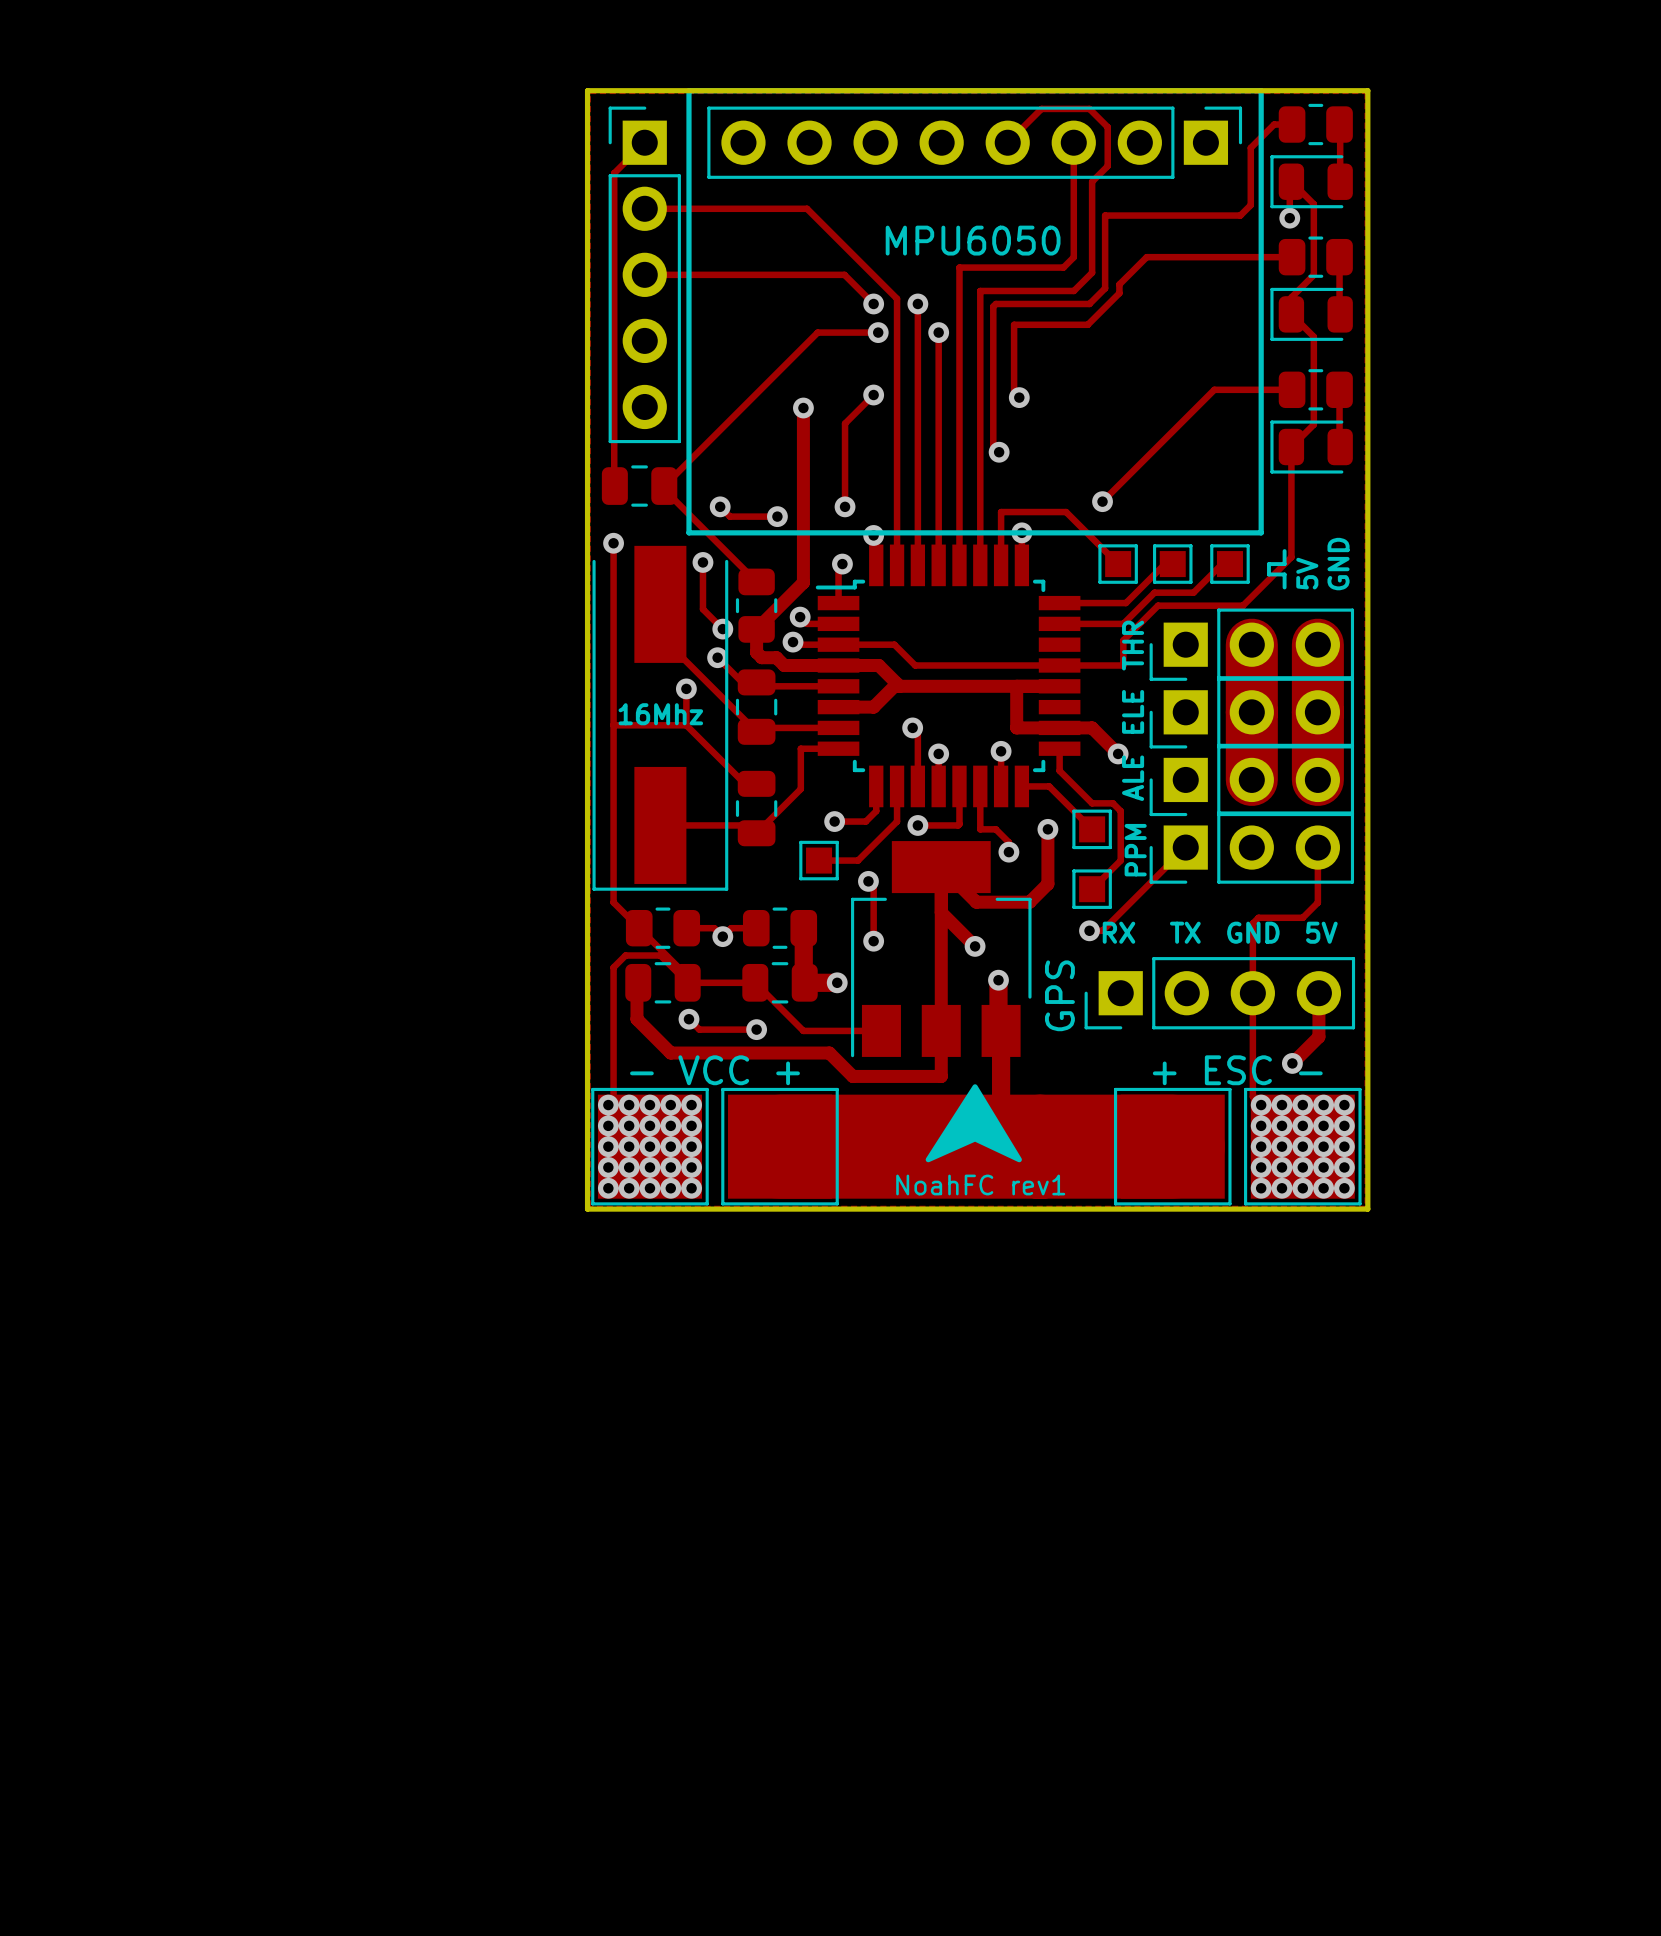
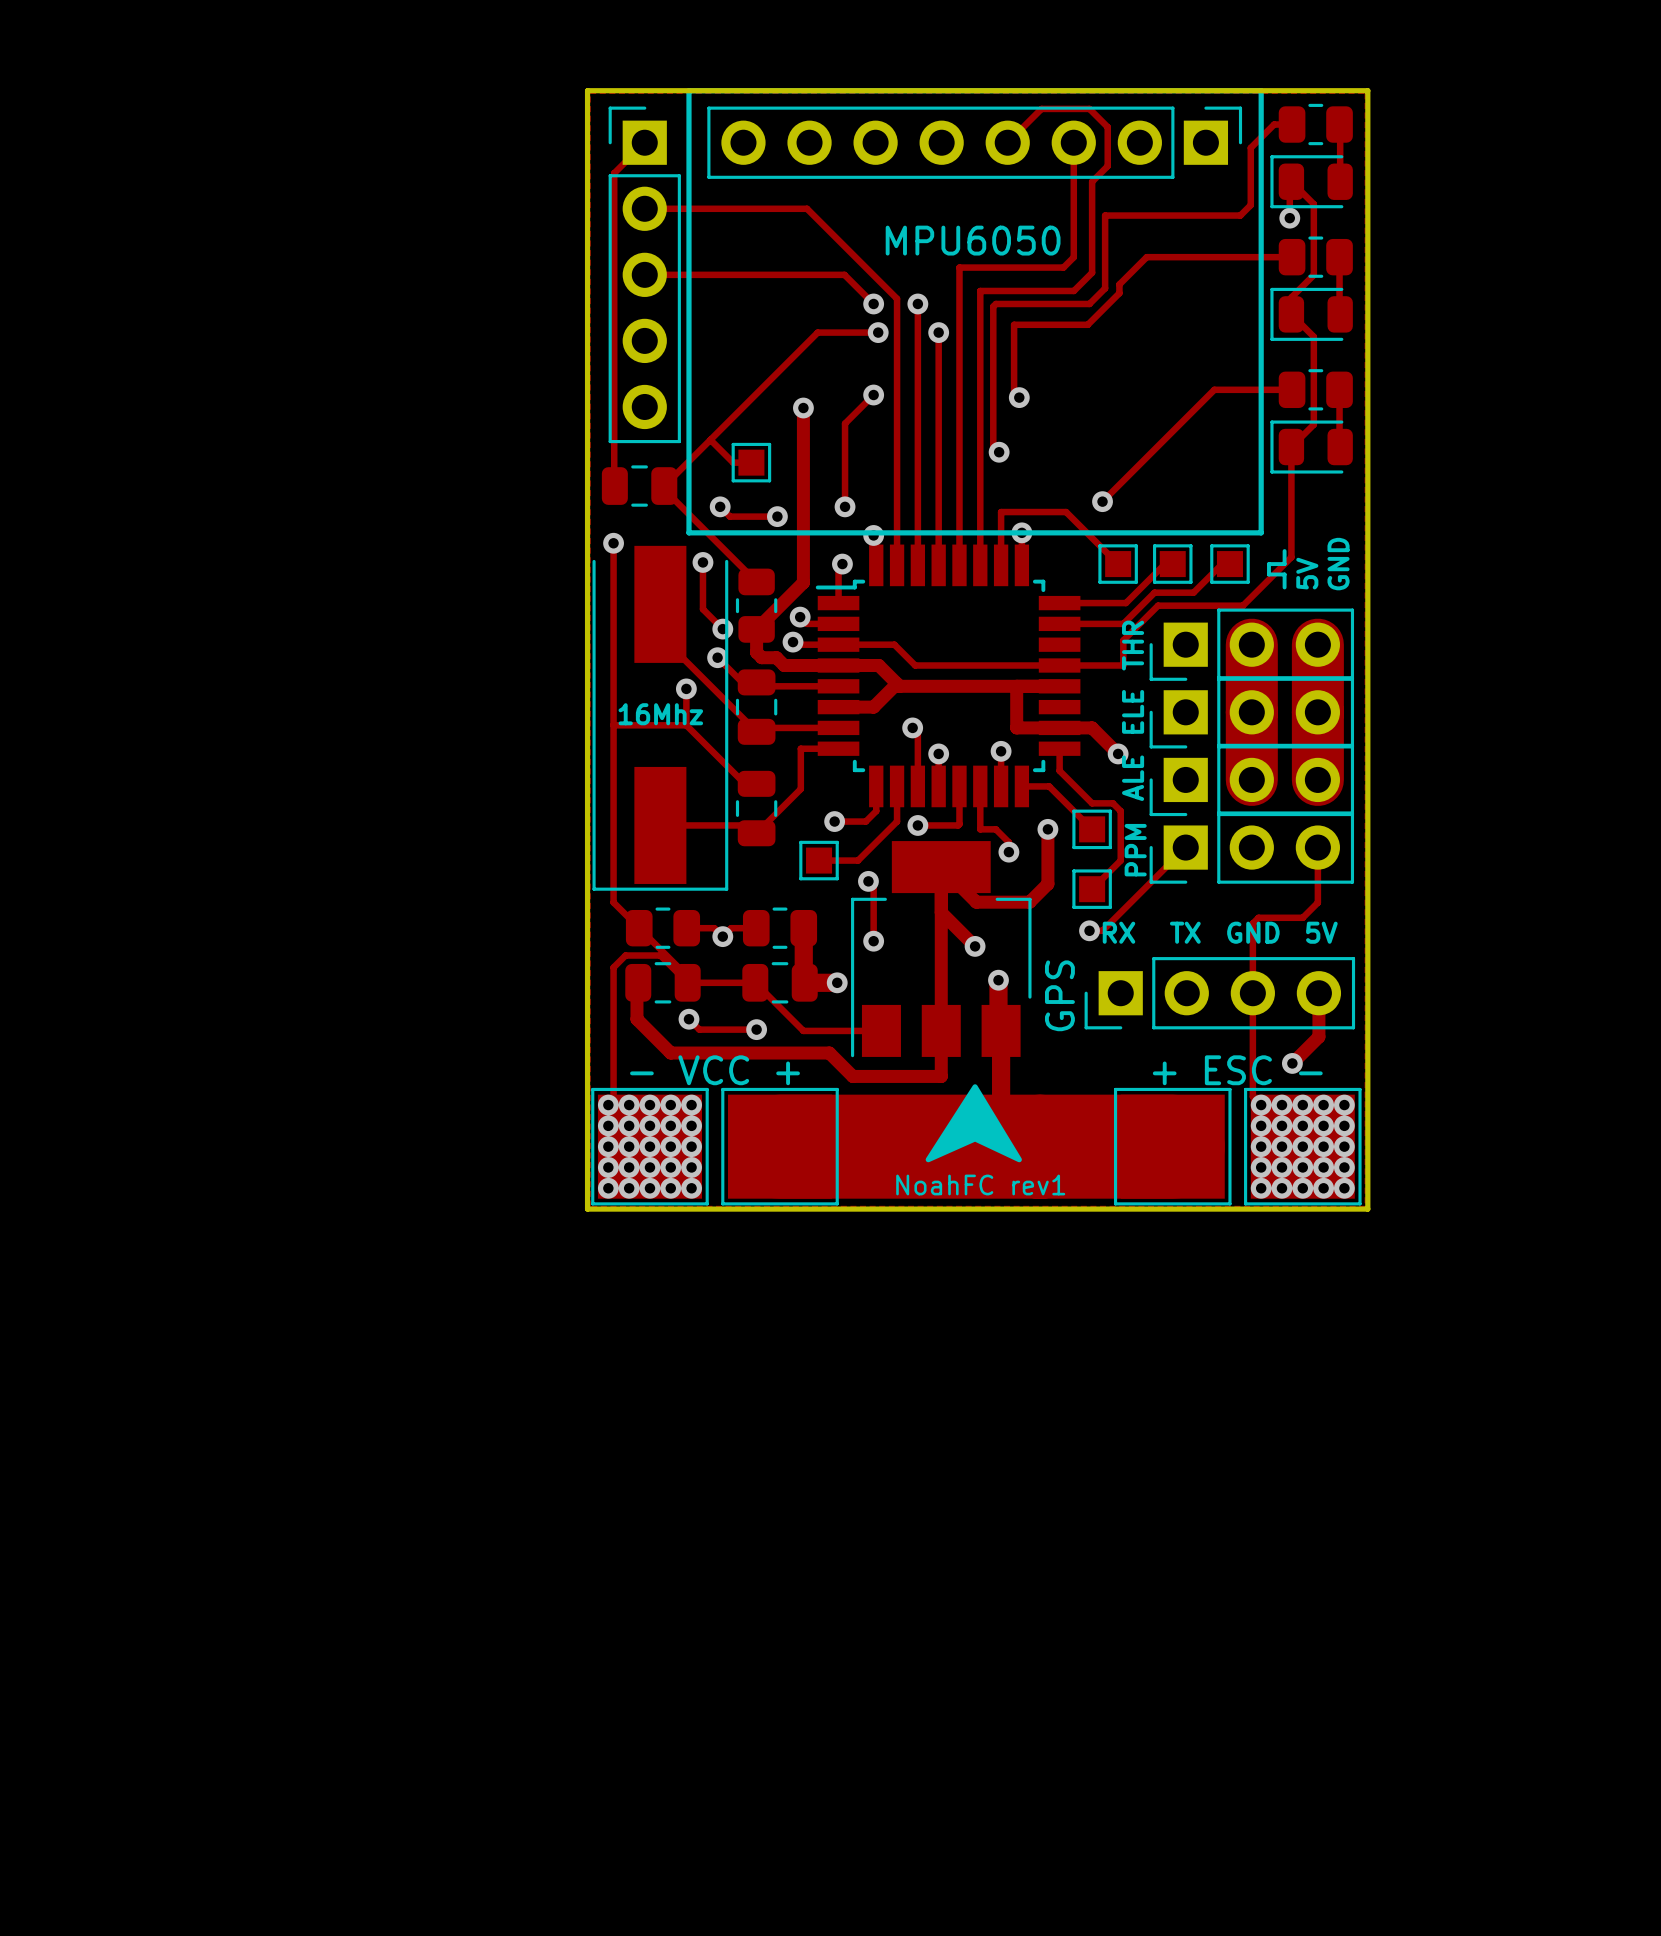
track: none -> (710, 439) (733, 462) (751, 462)
part: none -> (751, 462)

